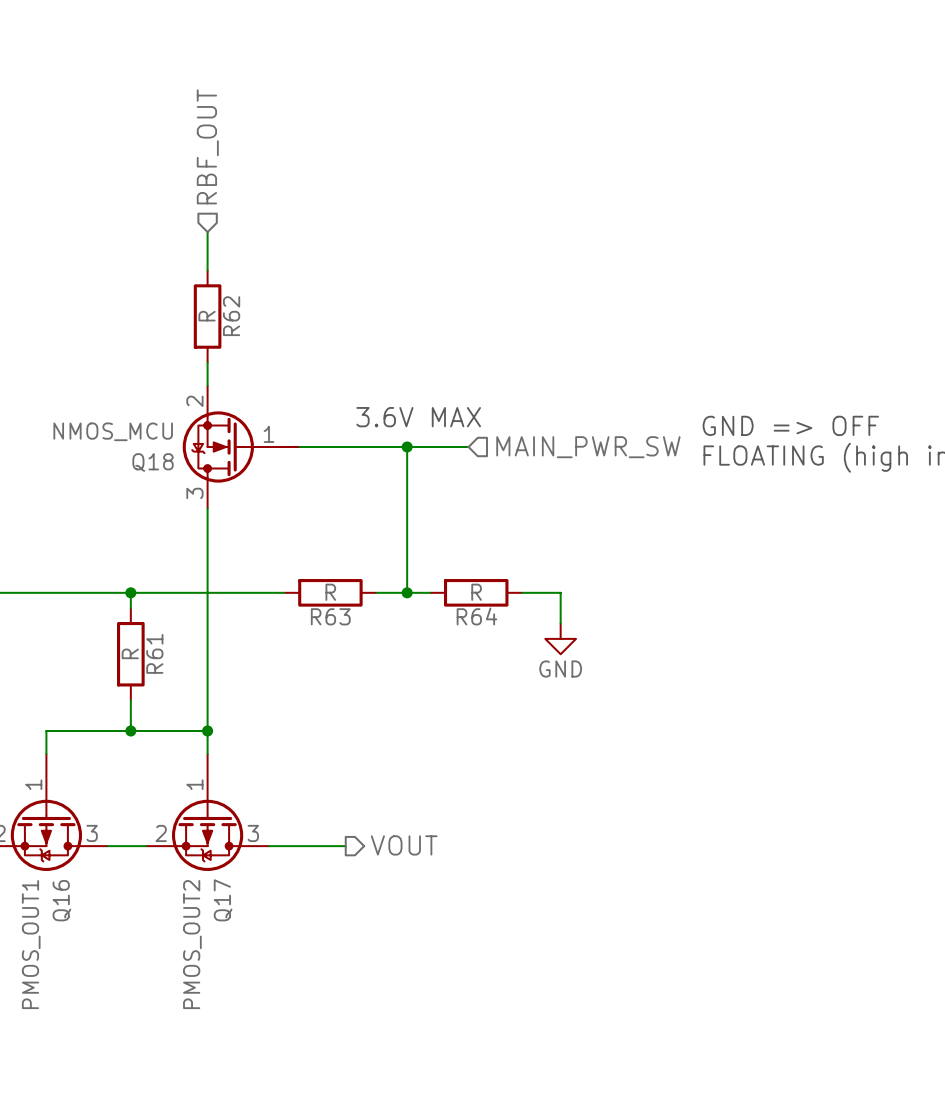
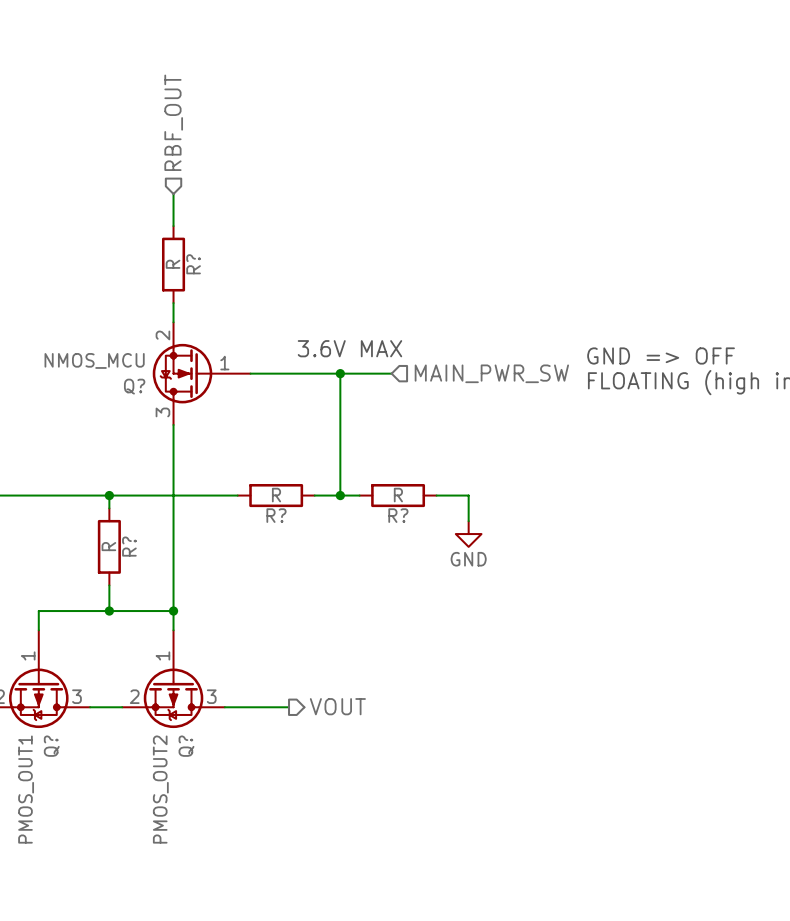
R62 name: R62 (231, 316) -> R? (193, 264)
Q18 name: Q18 (153, 462) -> Q? (134, 386)
R63 name: R63 (330, 616) -> R? (276, 515)
R64 name: R64 (476, 616) -> R? (398, 515)
R61 name: R61 (154, 653) -> R? (129, 546)
Q16 name: Q16 (61, 900) -> Q? (51, 746)
Q17 name: Q17 (223, 900) -> Q? (186, 746)

